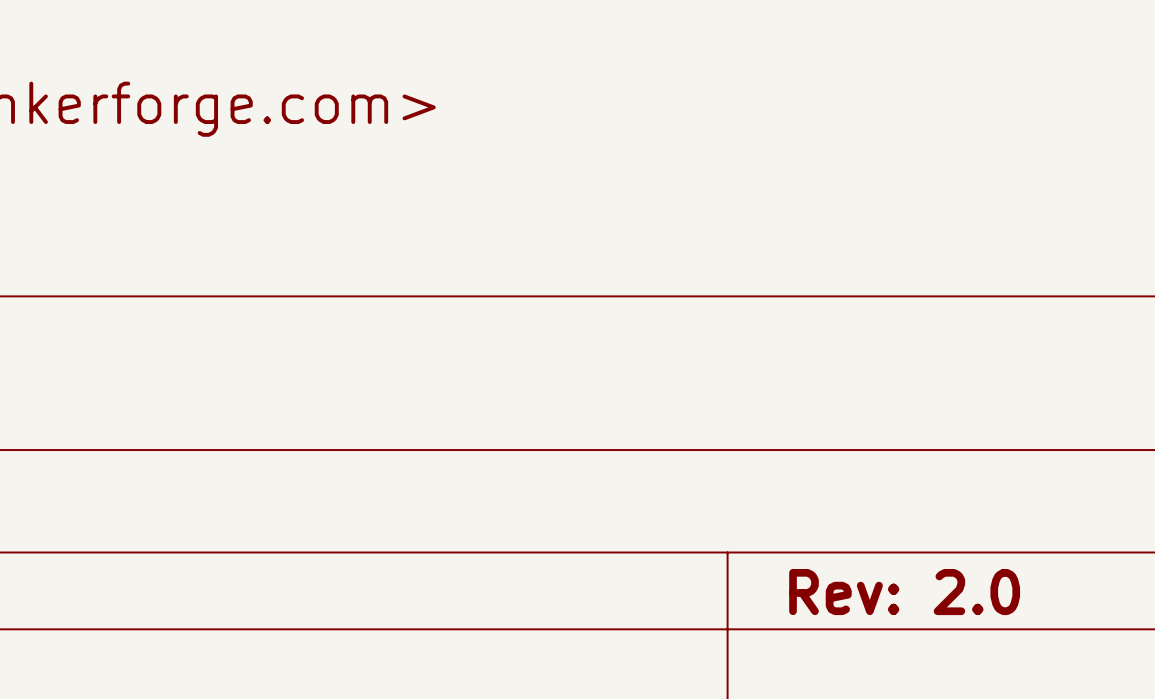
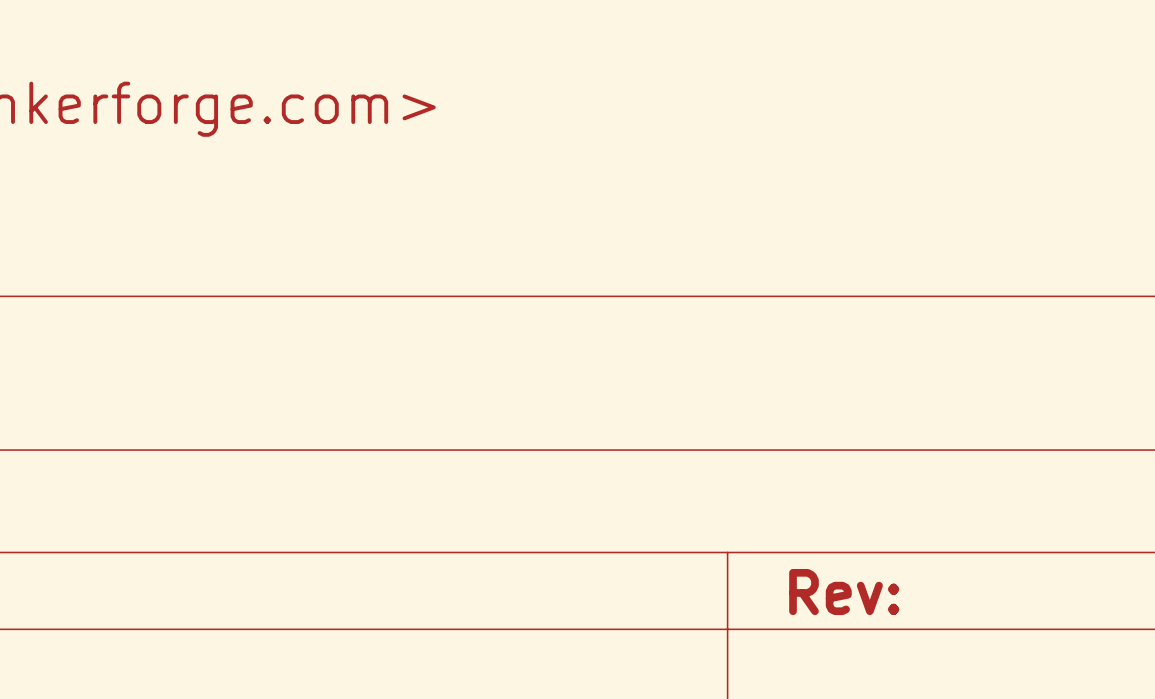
title block: Rev: 2.0 (904, 592) -> Rev: (844, 592)

